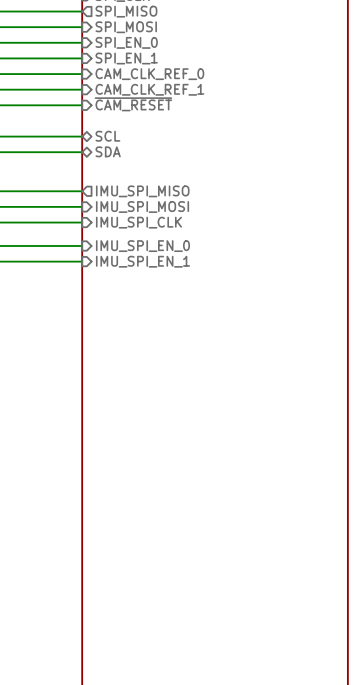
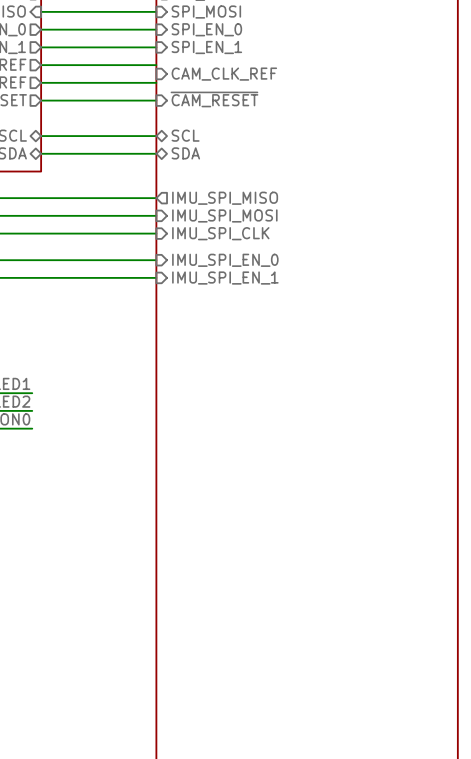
sheet pin: CAM_CLK_REF_0 (149, 74) -> none
sheet pin: none -> CAM_CLK_REF (224, 74)
sheet pin: CAM_CLK_REF_1 (149, 89) -> none

